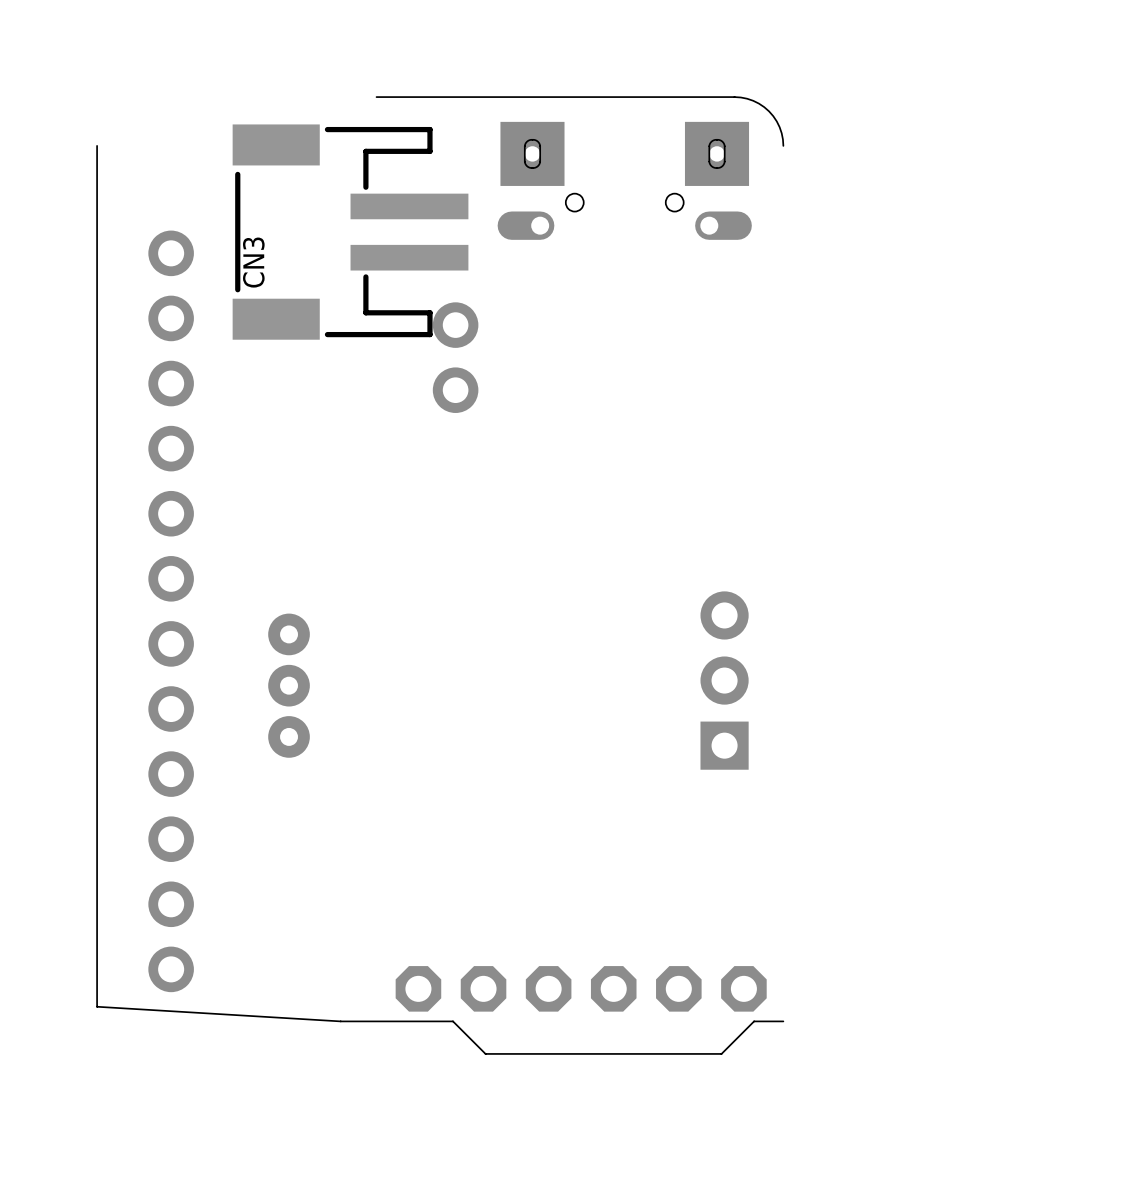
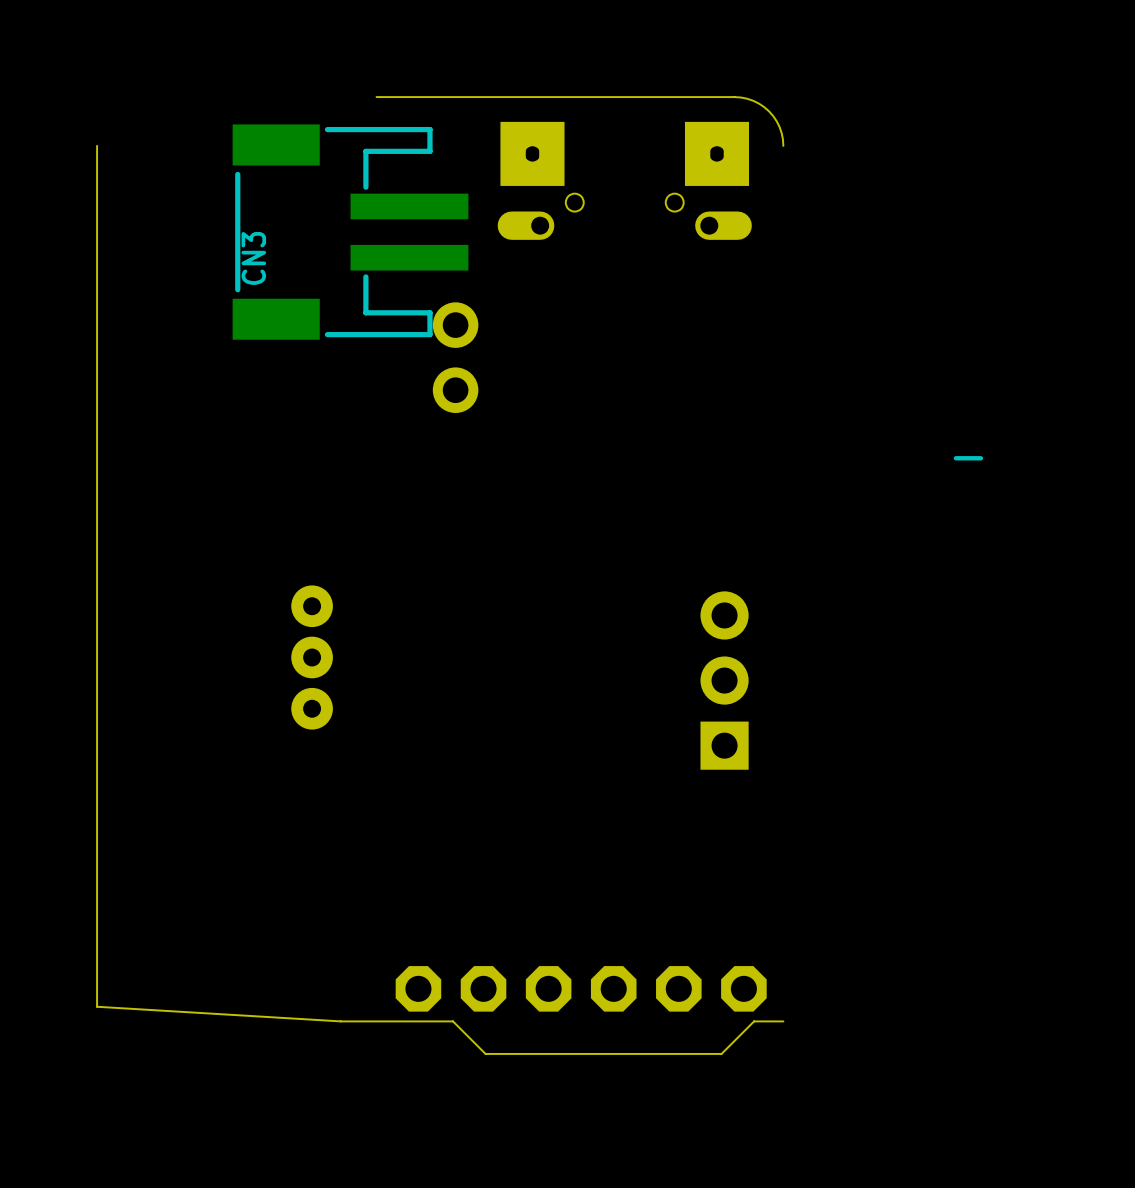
text: none -> - (968, 458)
part: (171, 611) -> none
part position: (289, 685) -> (312, 657)

